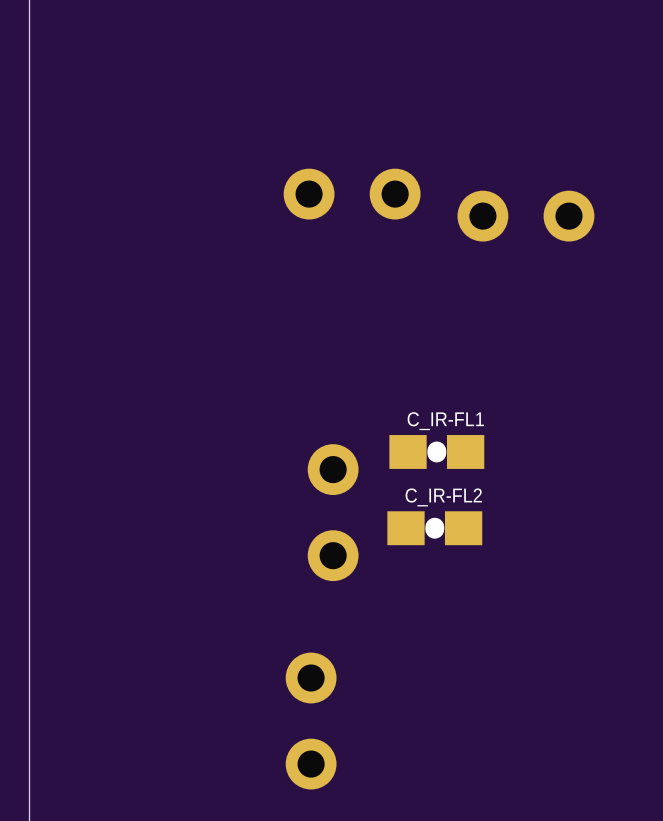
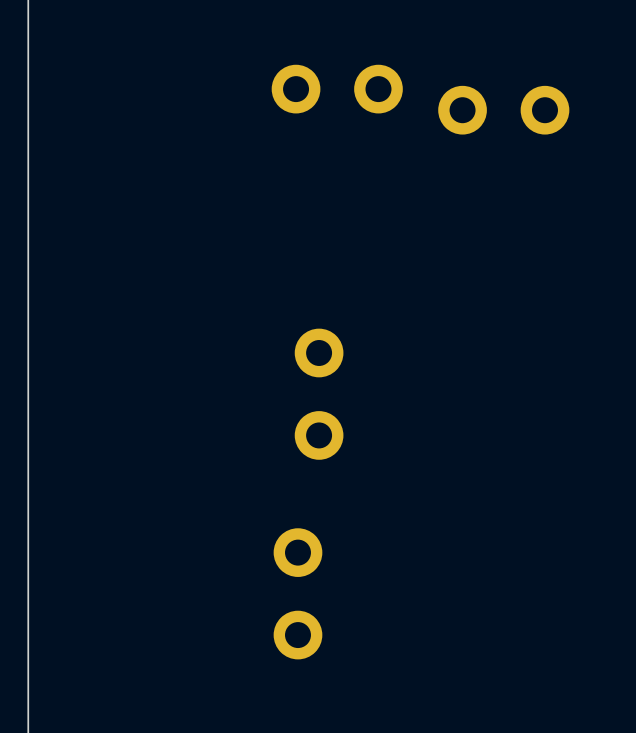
C_IR-FL1: (436, 451) -> none
C_IR-FL2: (434, 528) -> none

